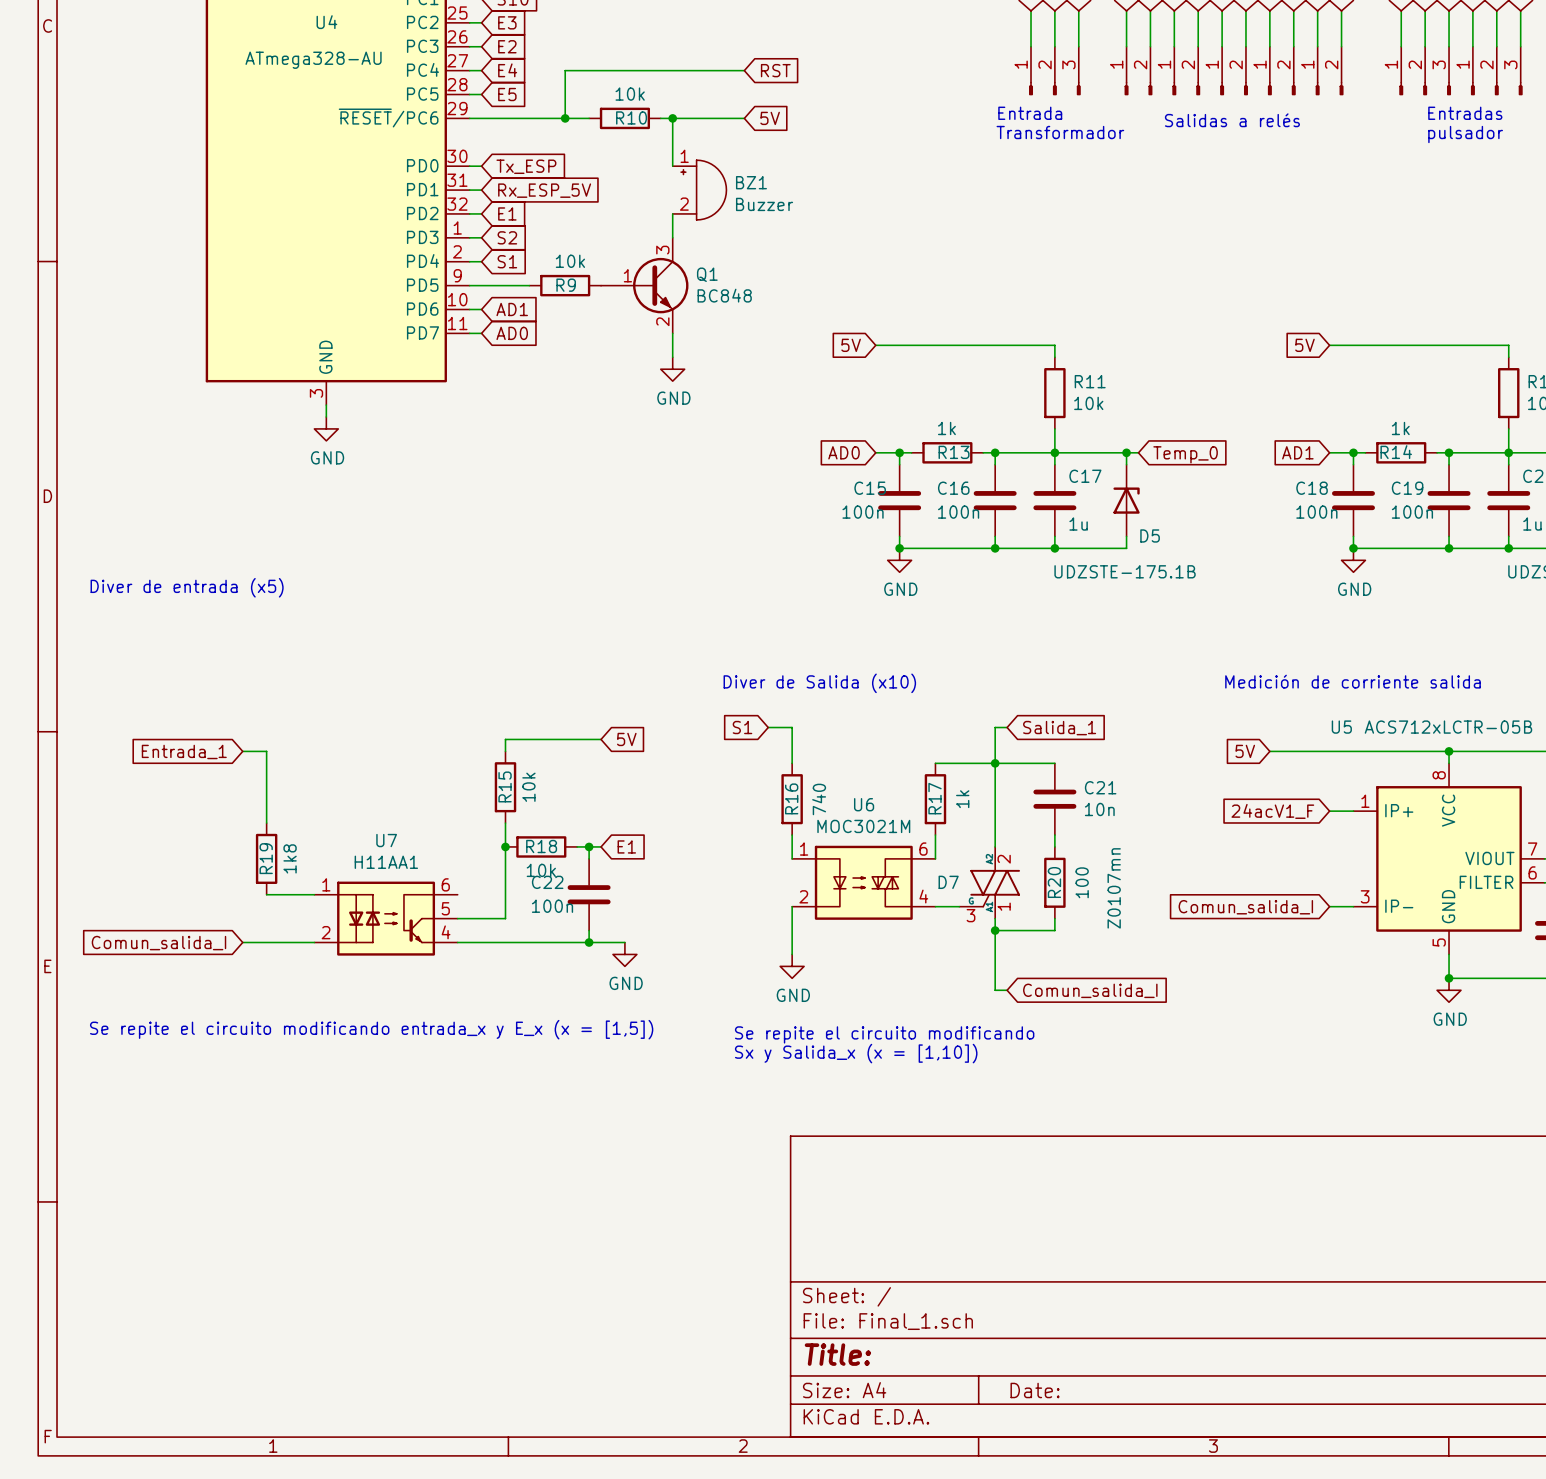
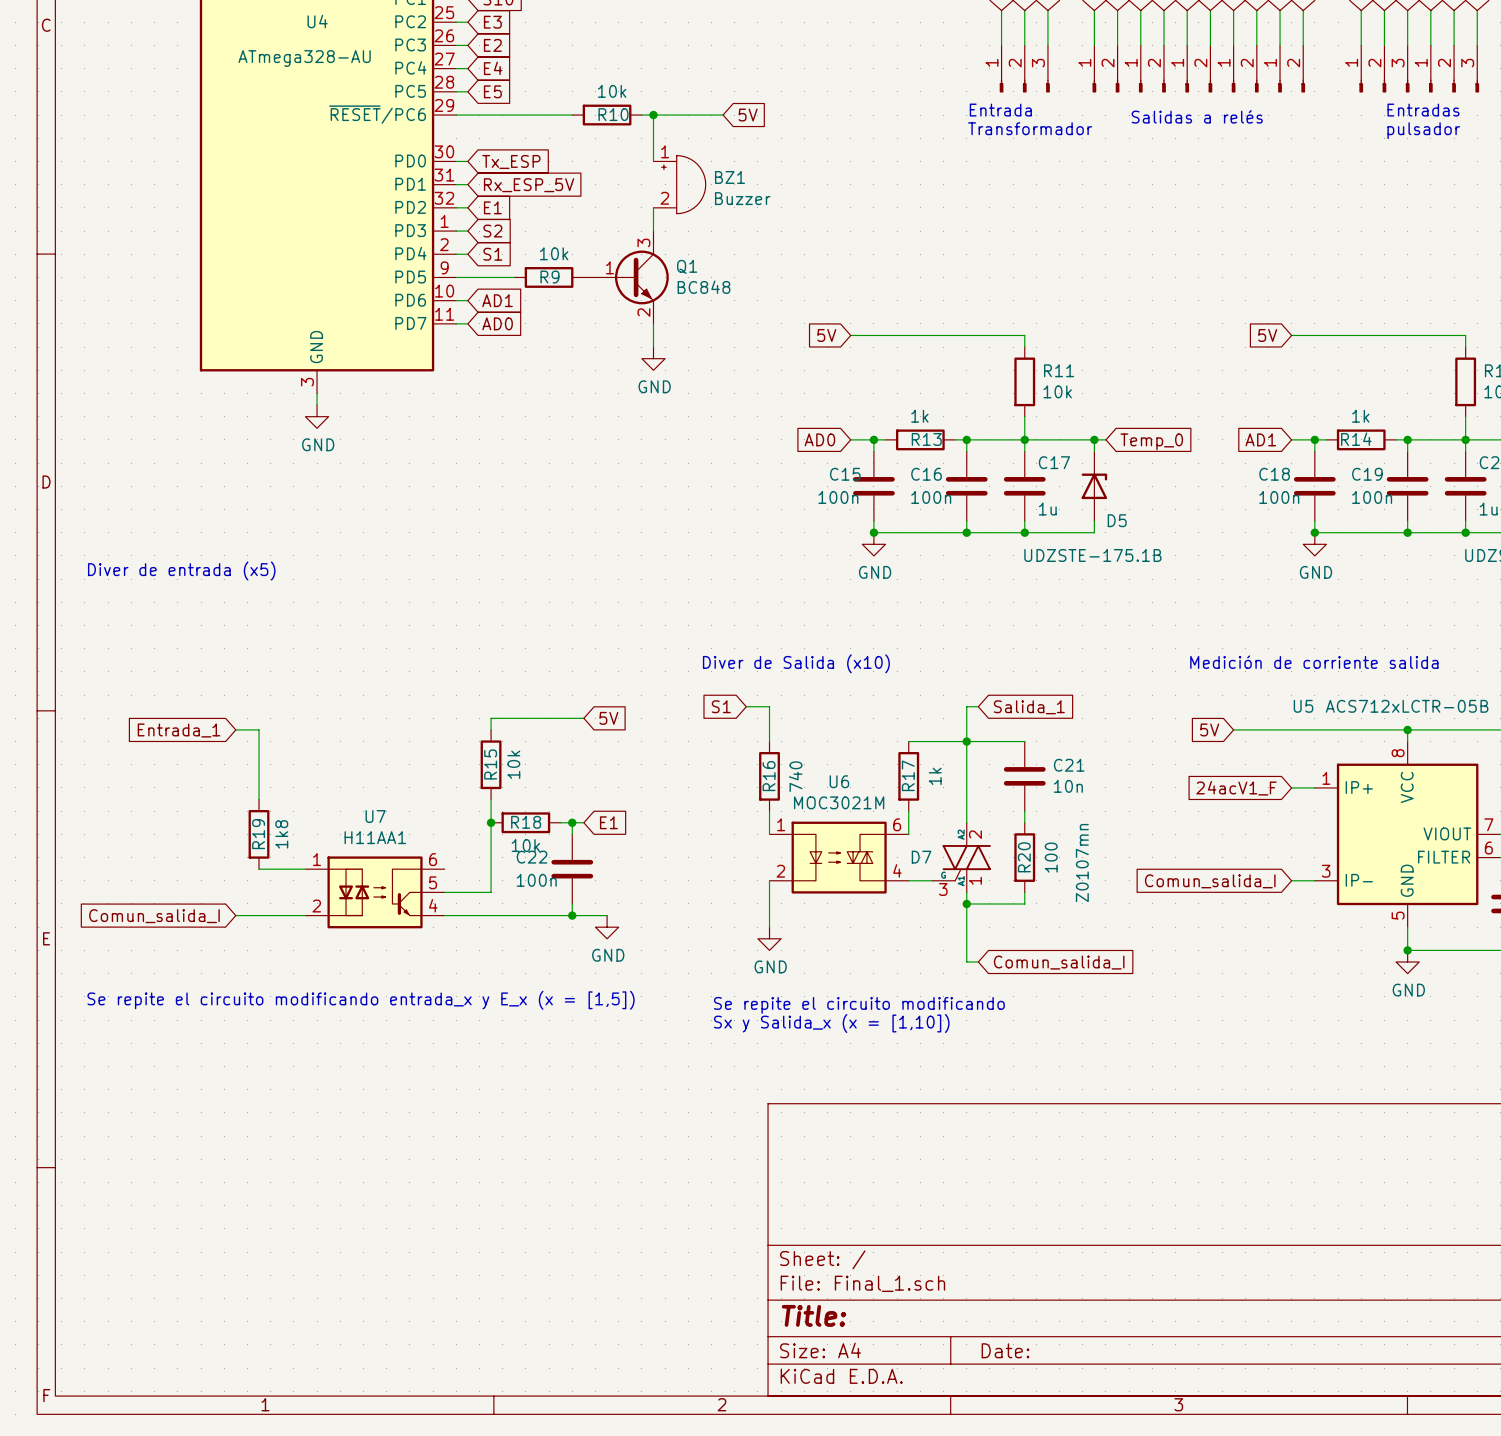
wire: (744, 70) (565, 70) (565, 118) -> none
global label: RST (775, 70) -> none
junction: (565, 118) -> none

